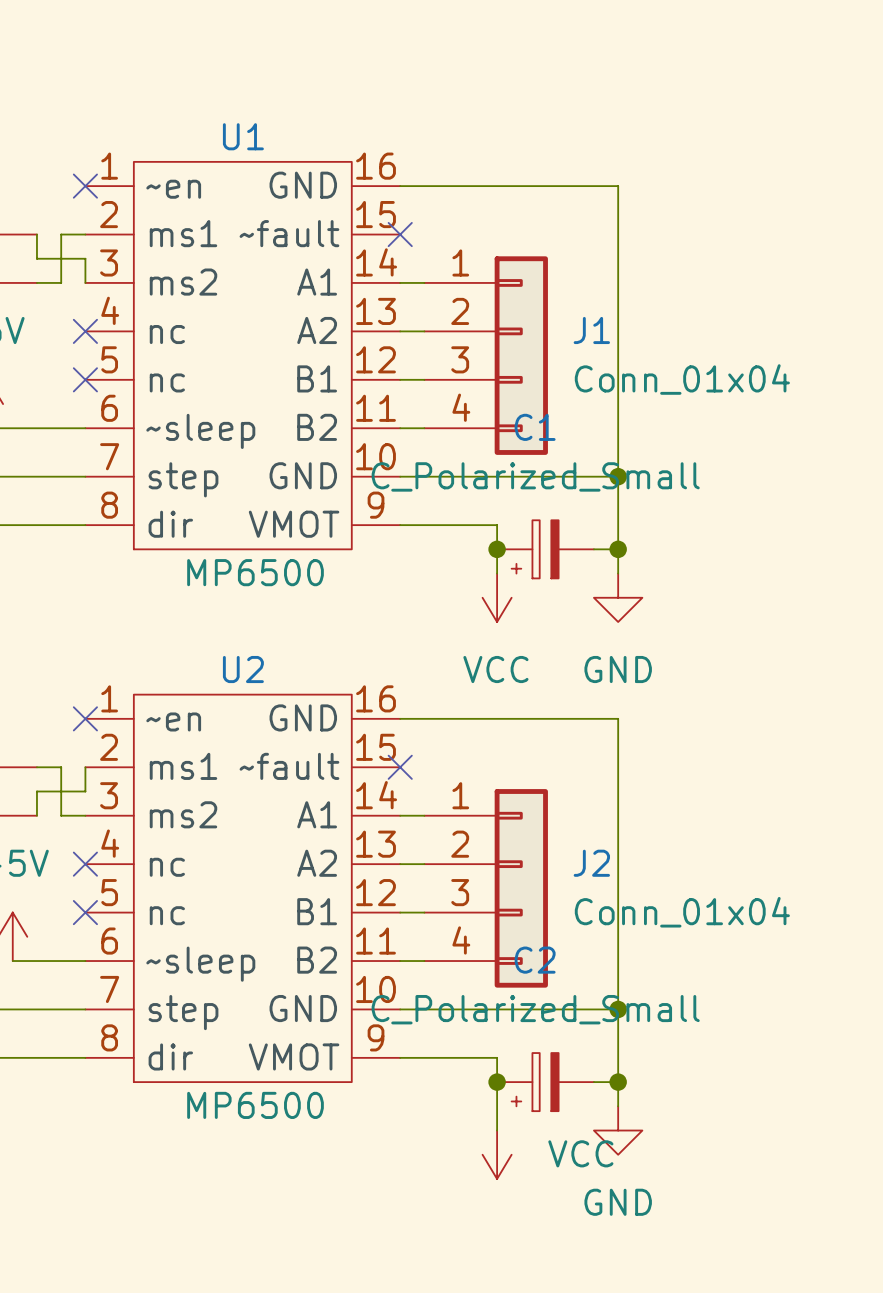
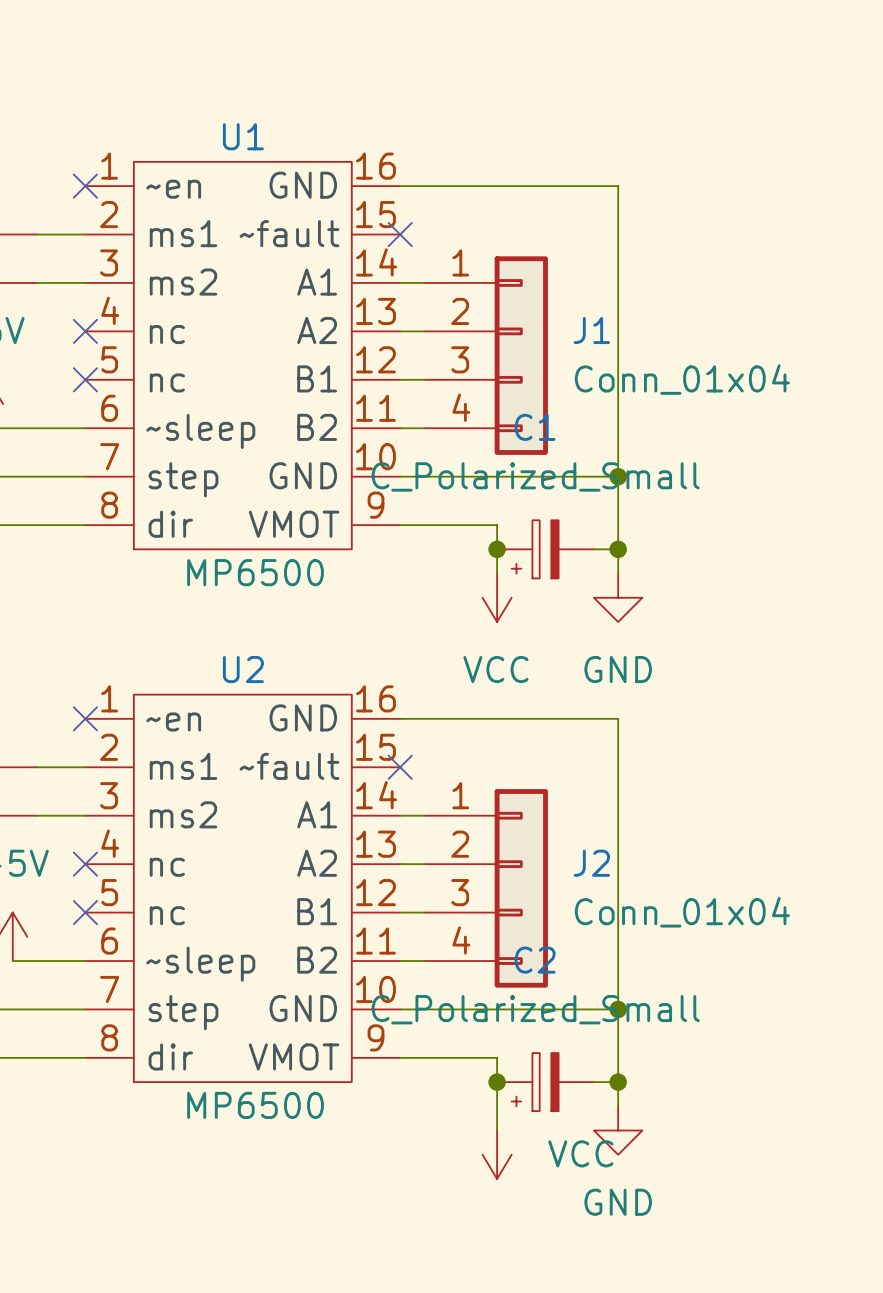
wire: (36, 234) (36, 258) (85, 258) (85, 282) -> (36, 234) (61, 234)
wire: (61, 234) (61, 282) -> (85, 282) (61, 282)
wire: (61, 767) (61, 815) -> (61, 767) (85, 767)
wire: (85, 767) (85, 791) (36, 791) (36, 815) -> (61, 815) (36, 815)

